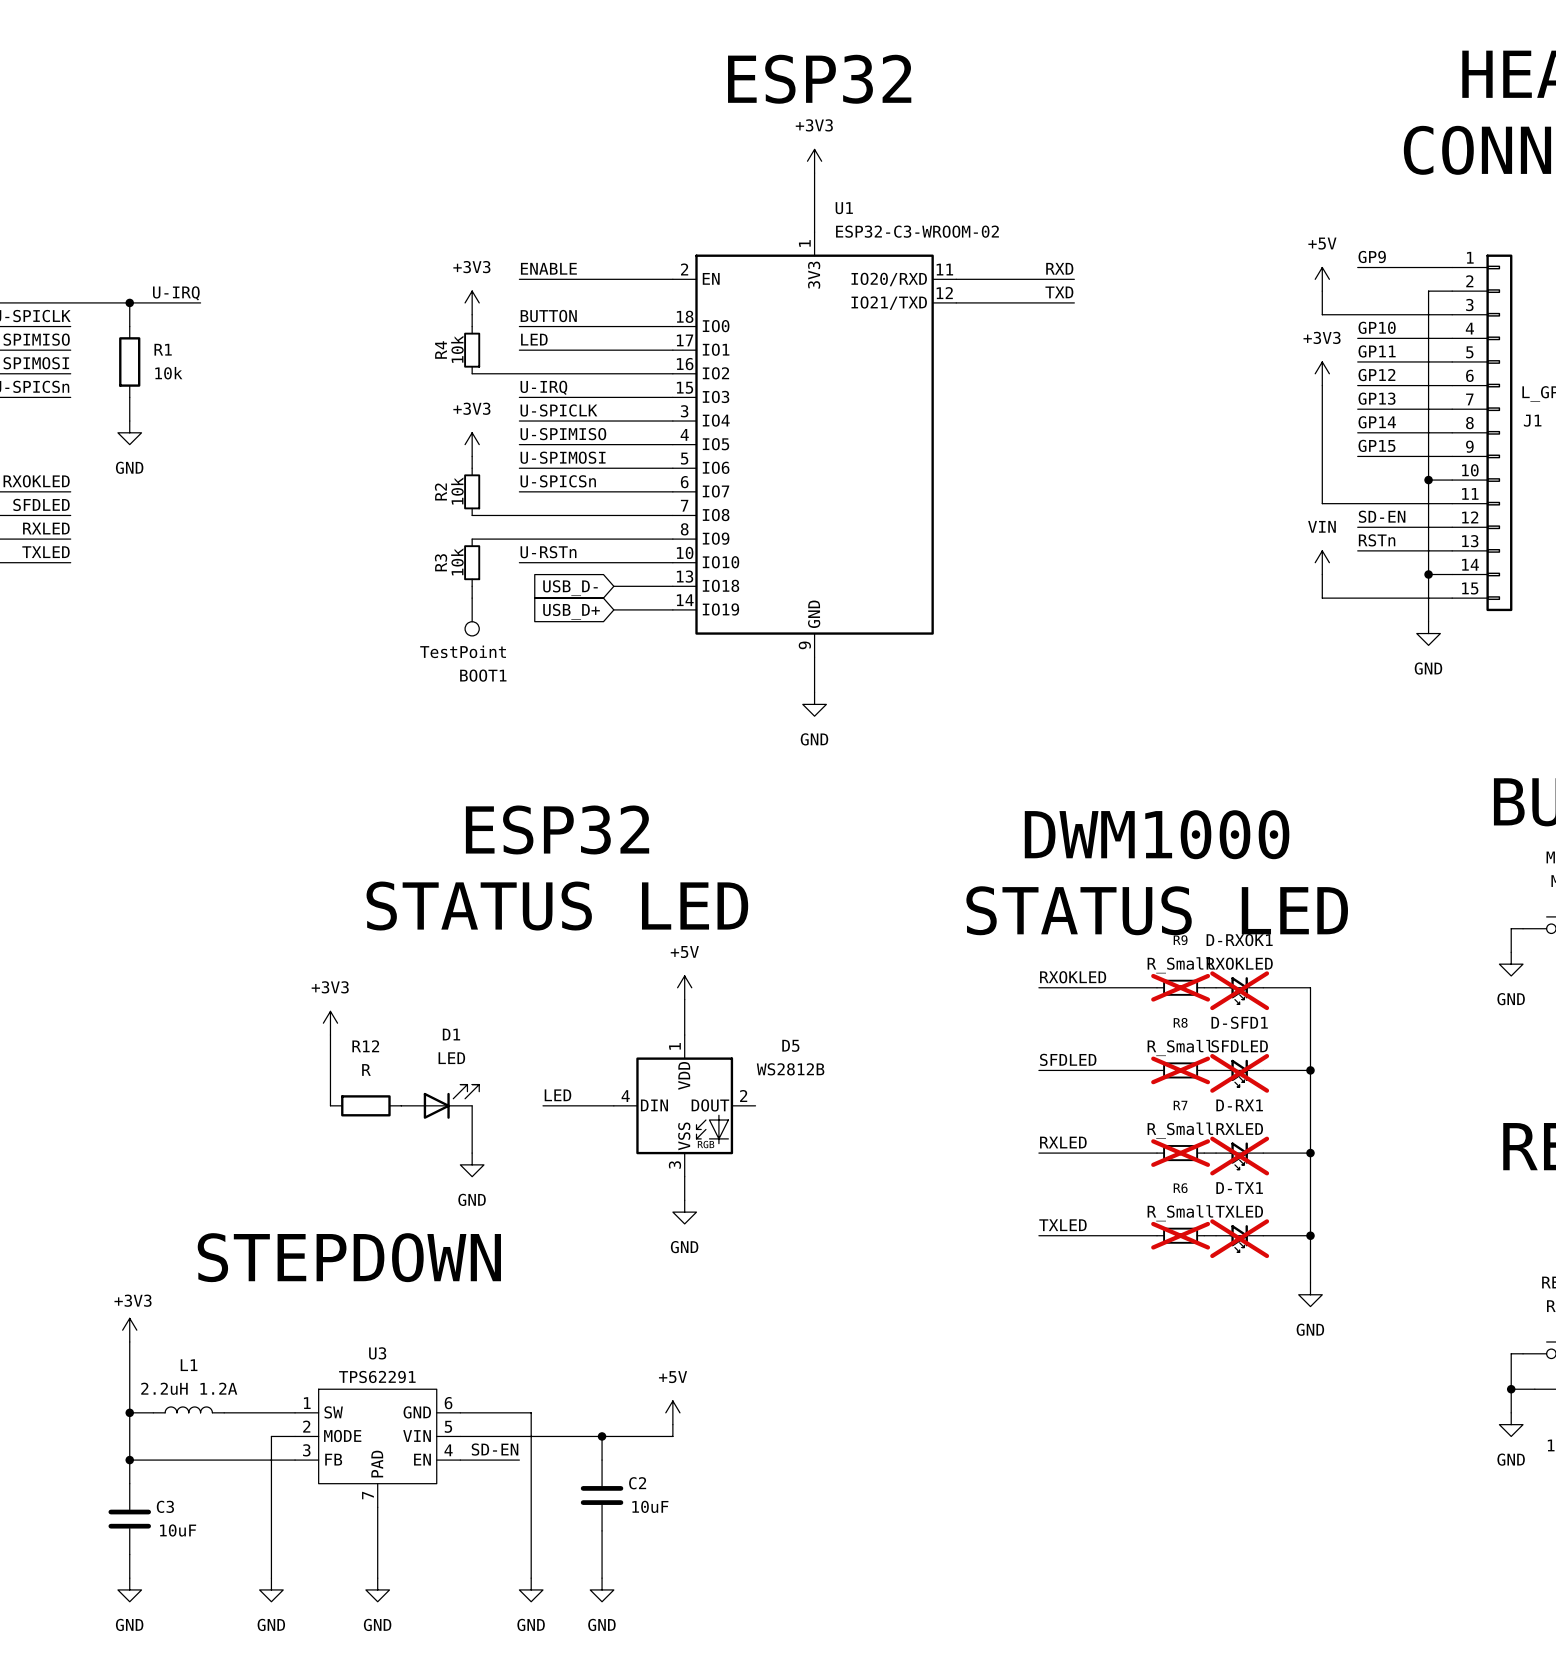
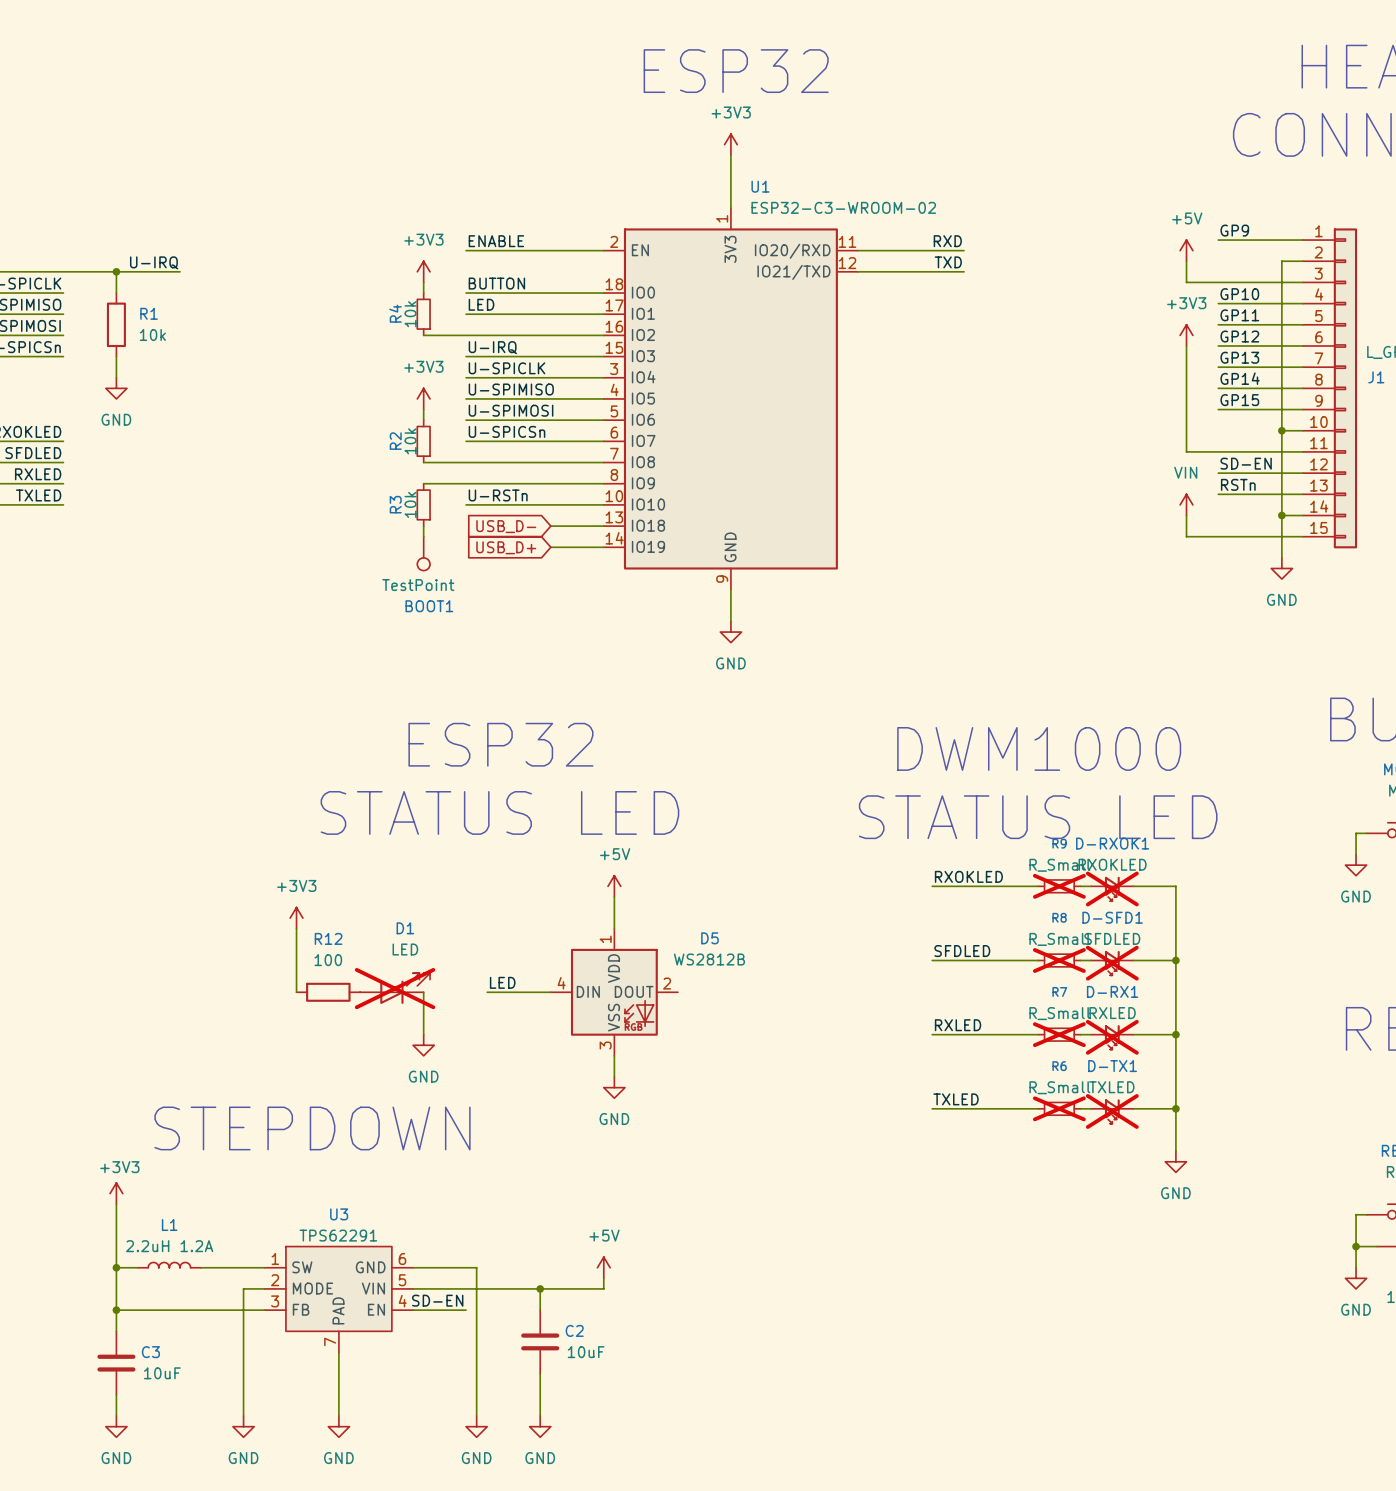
R12 value: R (366, 1069) -> 100 (328, 960)
D1 do-not-place cross: none -> (395, 988)

